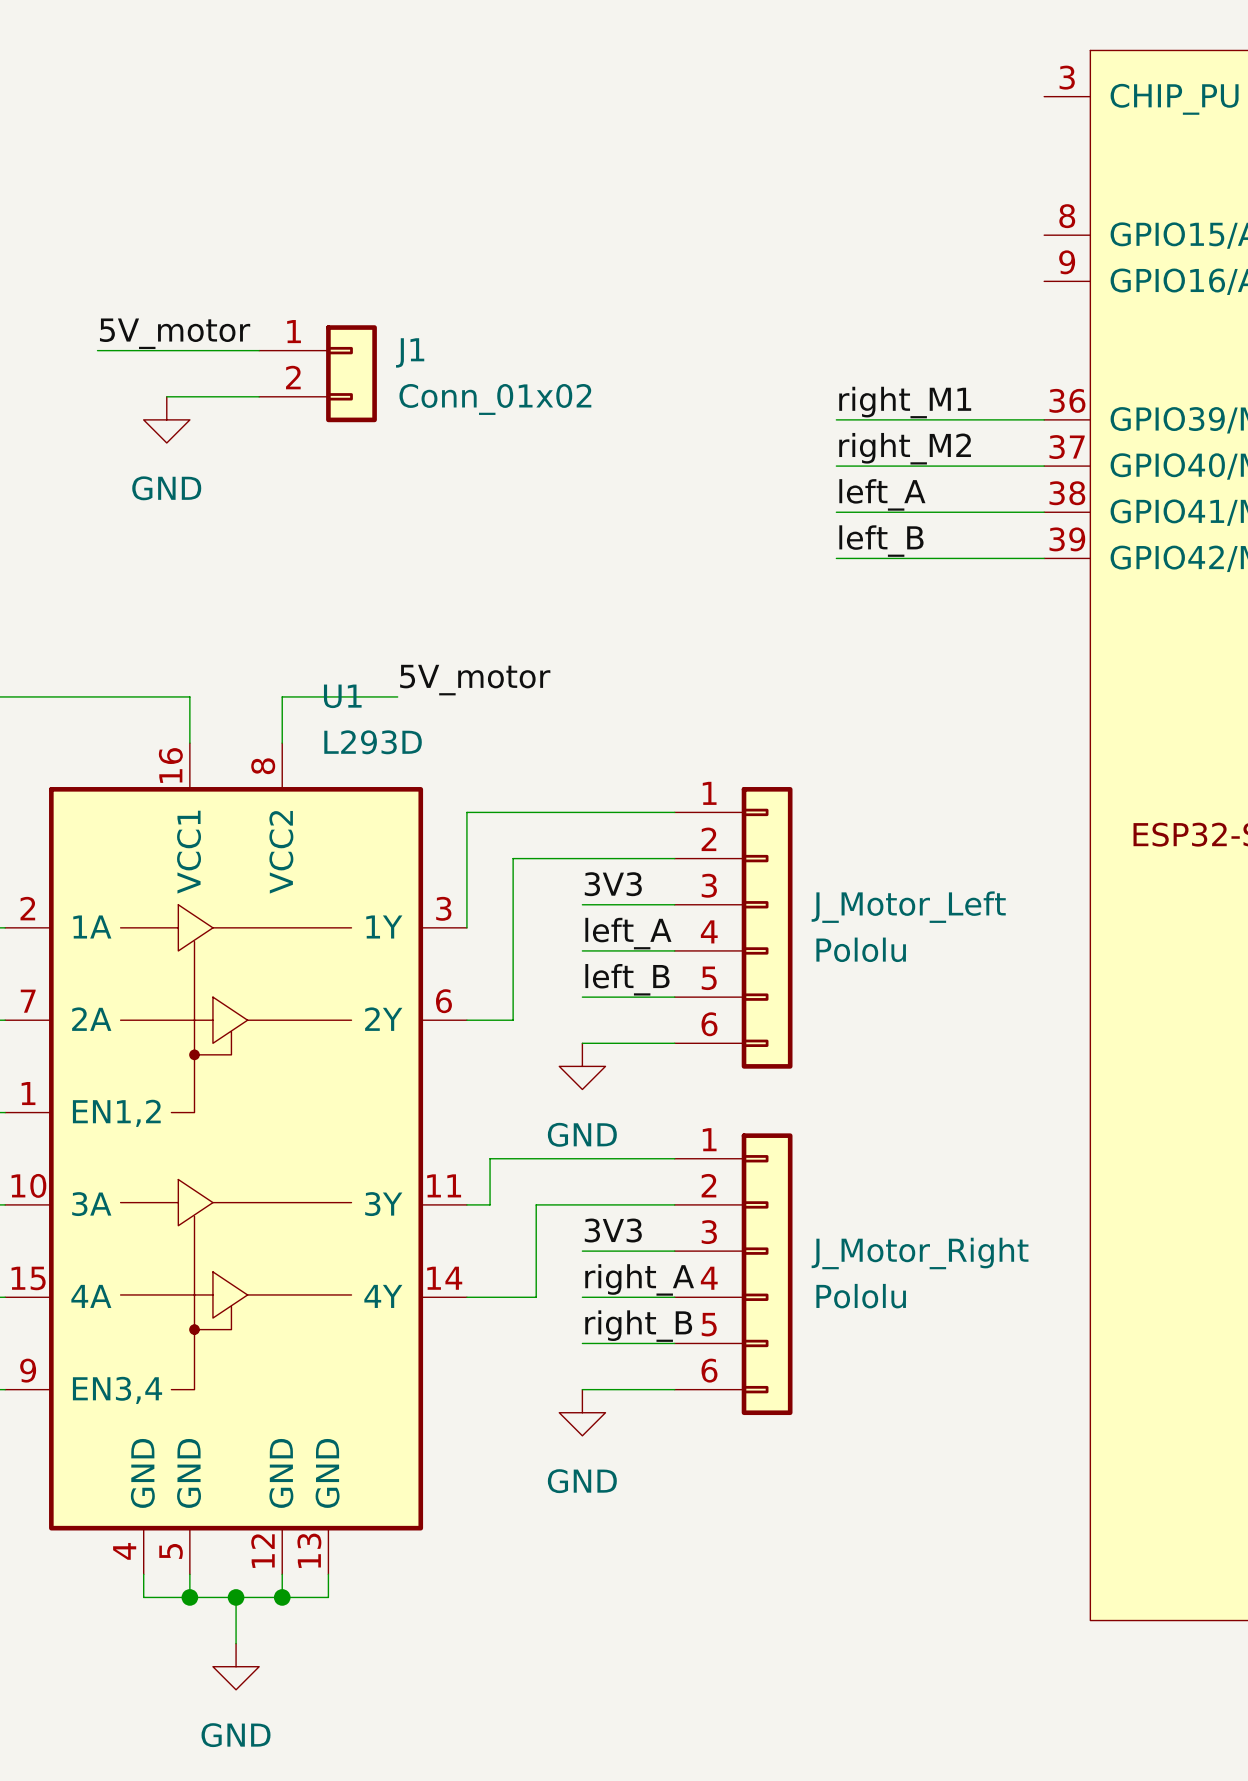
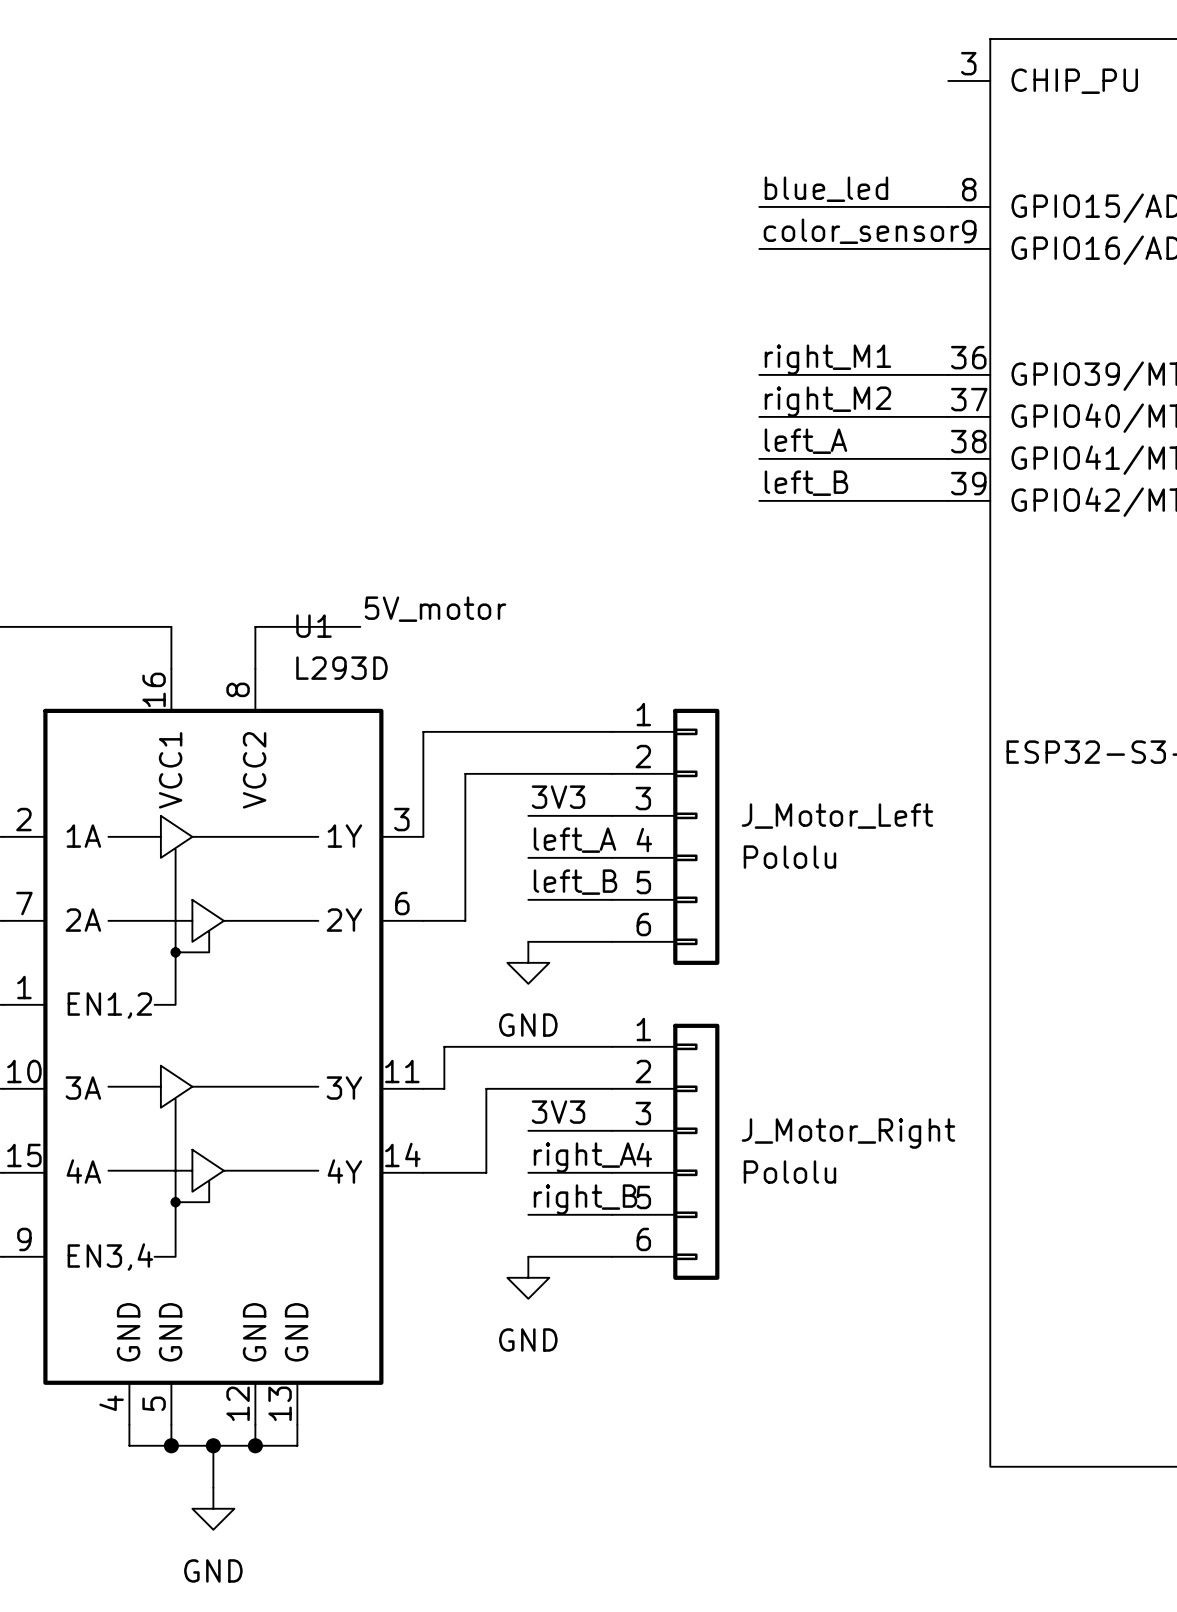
label: none -> blue_led (826, 189)
wire: none -> (759, 206) (948, 206)
label: none -> color_sensor (861, 231)
wire: none -> (759, 248) (948, 248)
label: 5V_motor (175, 333) -> none
wire: (97, 350) (259, 350) -> none
J1: Conn_01x02 (318, 373) -> none
wire: (166, 396) (259, 396) -> none
power symbol: GND (166, 419) -> none

